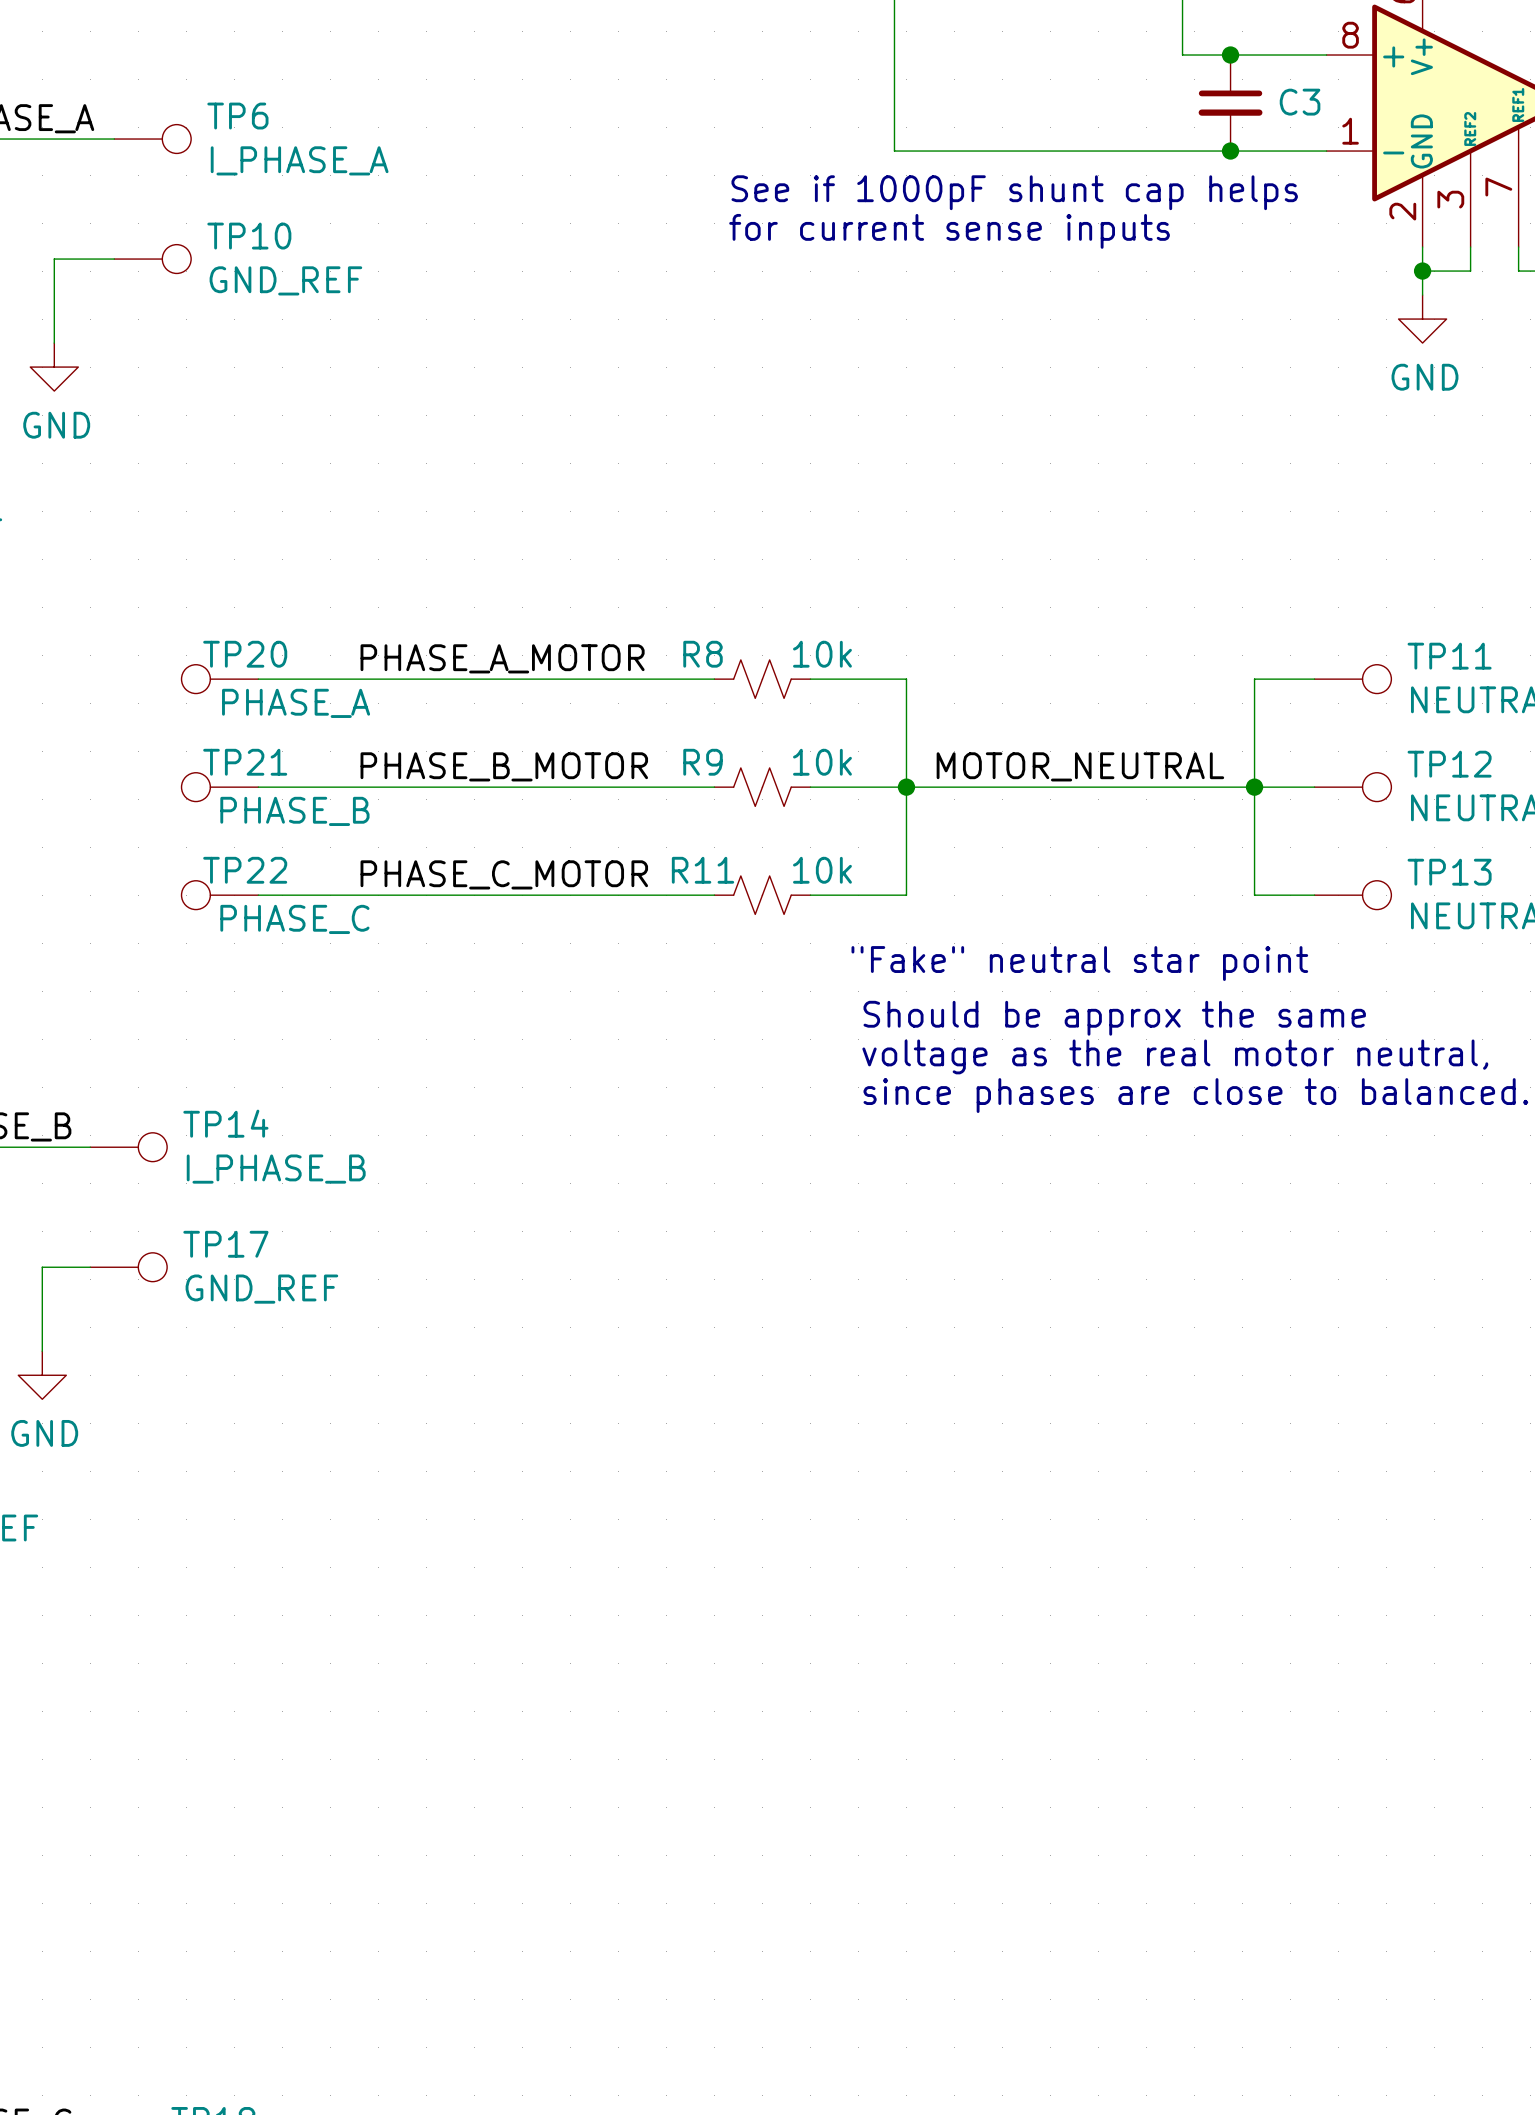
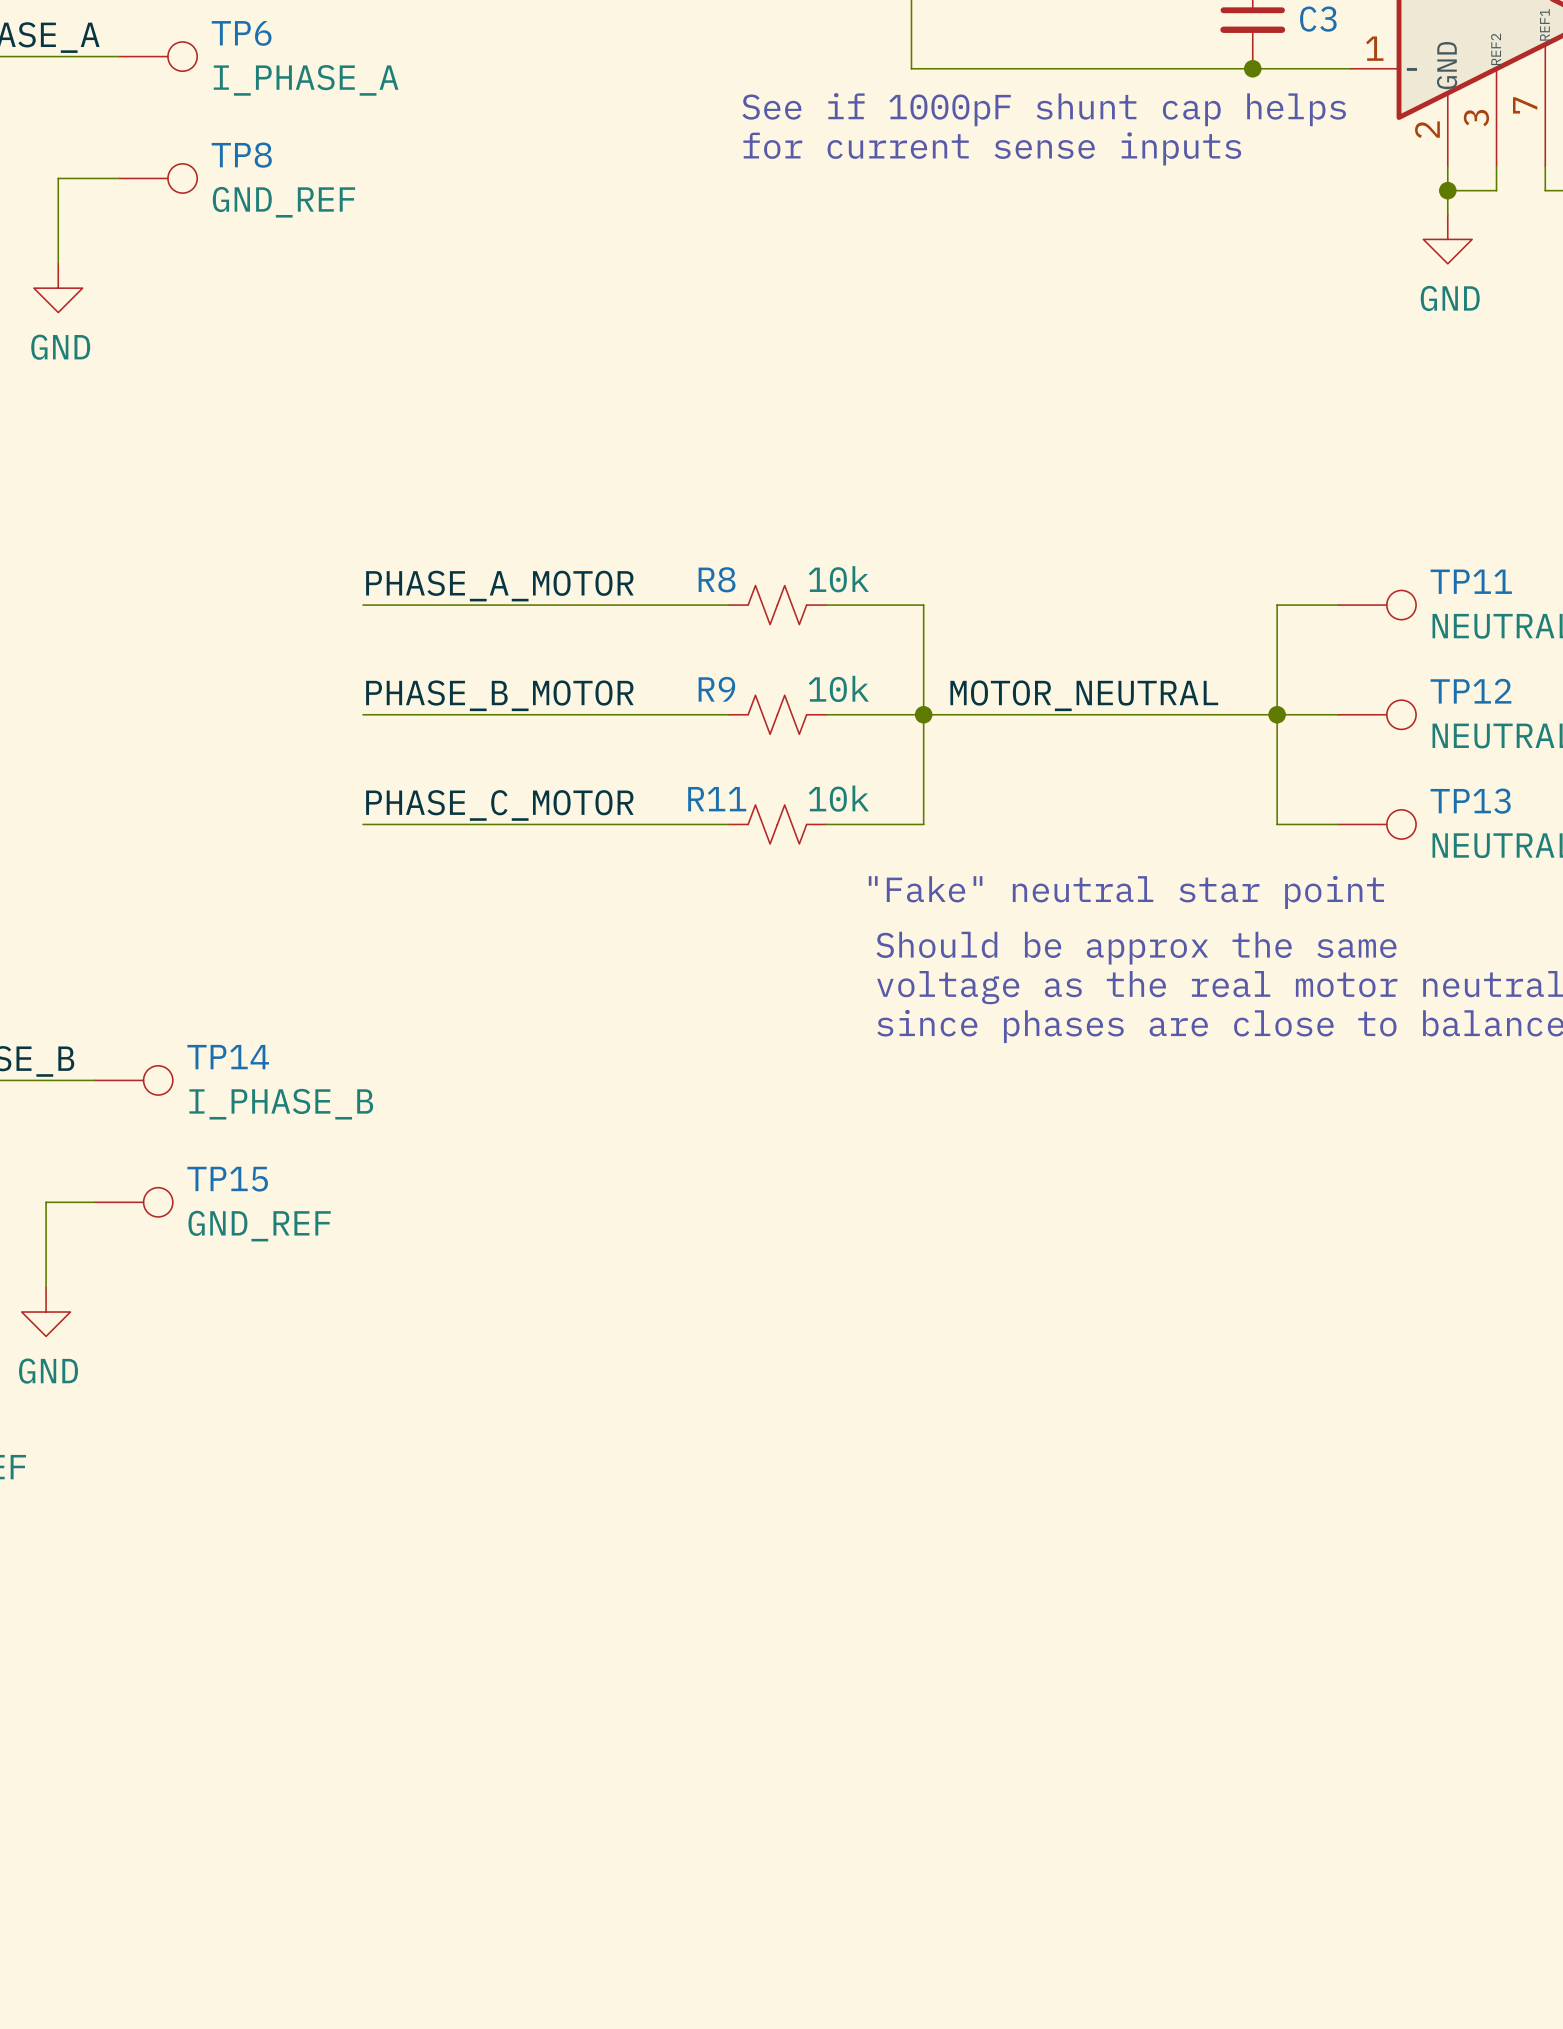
TP10 name: TP10 (249, 236) -> TP8 (241, 155)
TP20: PHASE_A (219, 679) -> none
wire: (258, 679) (354, 679) -> none
TP21: PHASE_B (219, 787) -> none
wire: (258, 787) (354, 787) -> none
TP22: PHASE_C (219, 895) -> none
wire: (258, 895) (354, 895) -> none
TP17 name: TP17 (225, 1244) -> TP15 (227, 1179)

